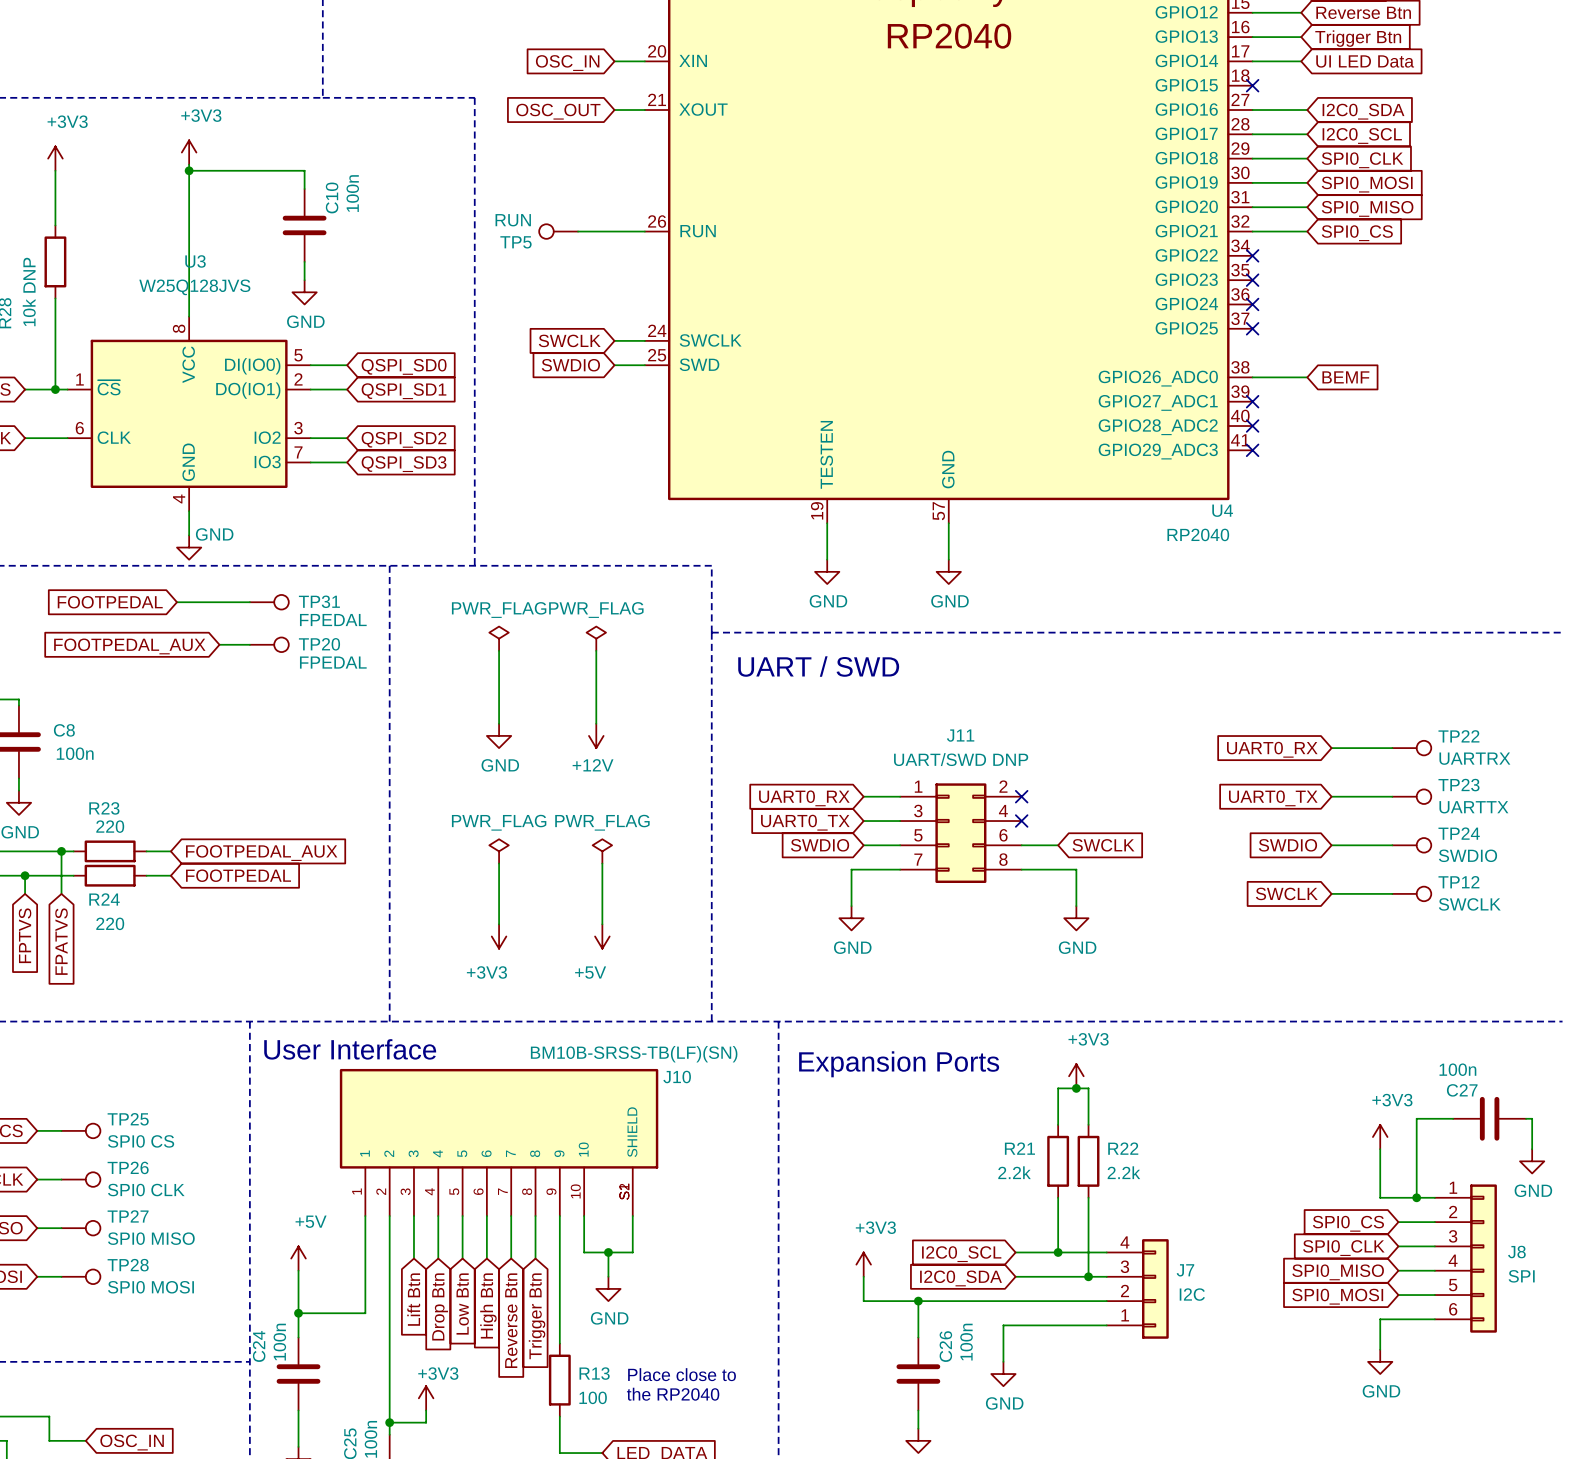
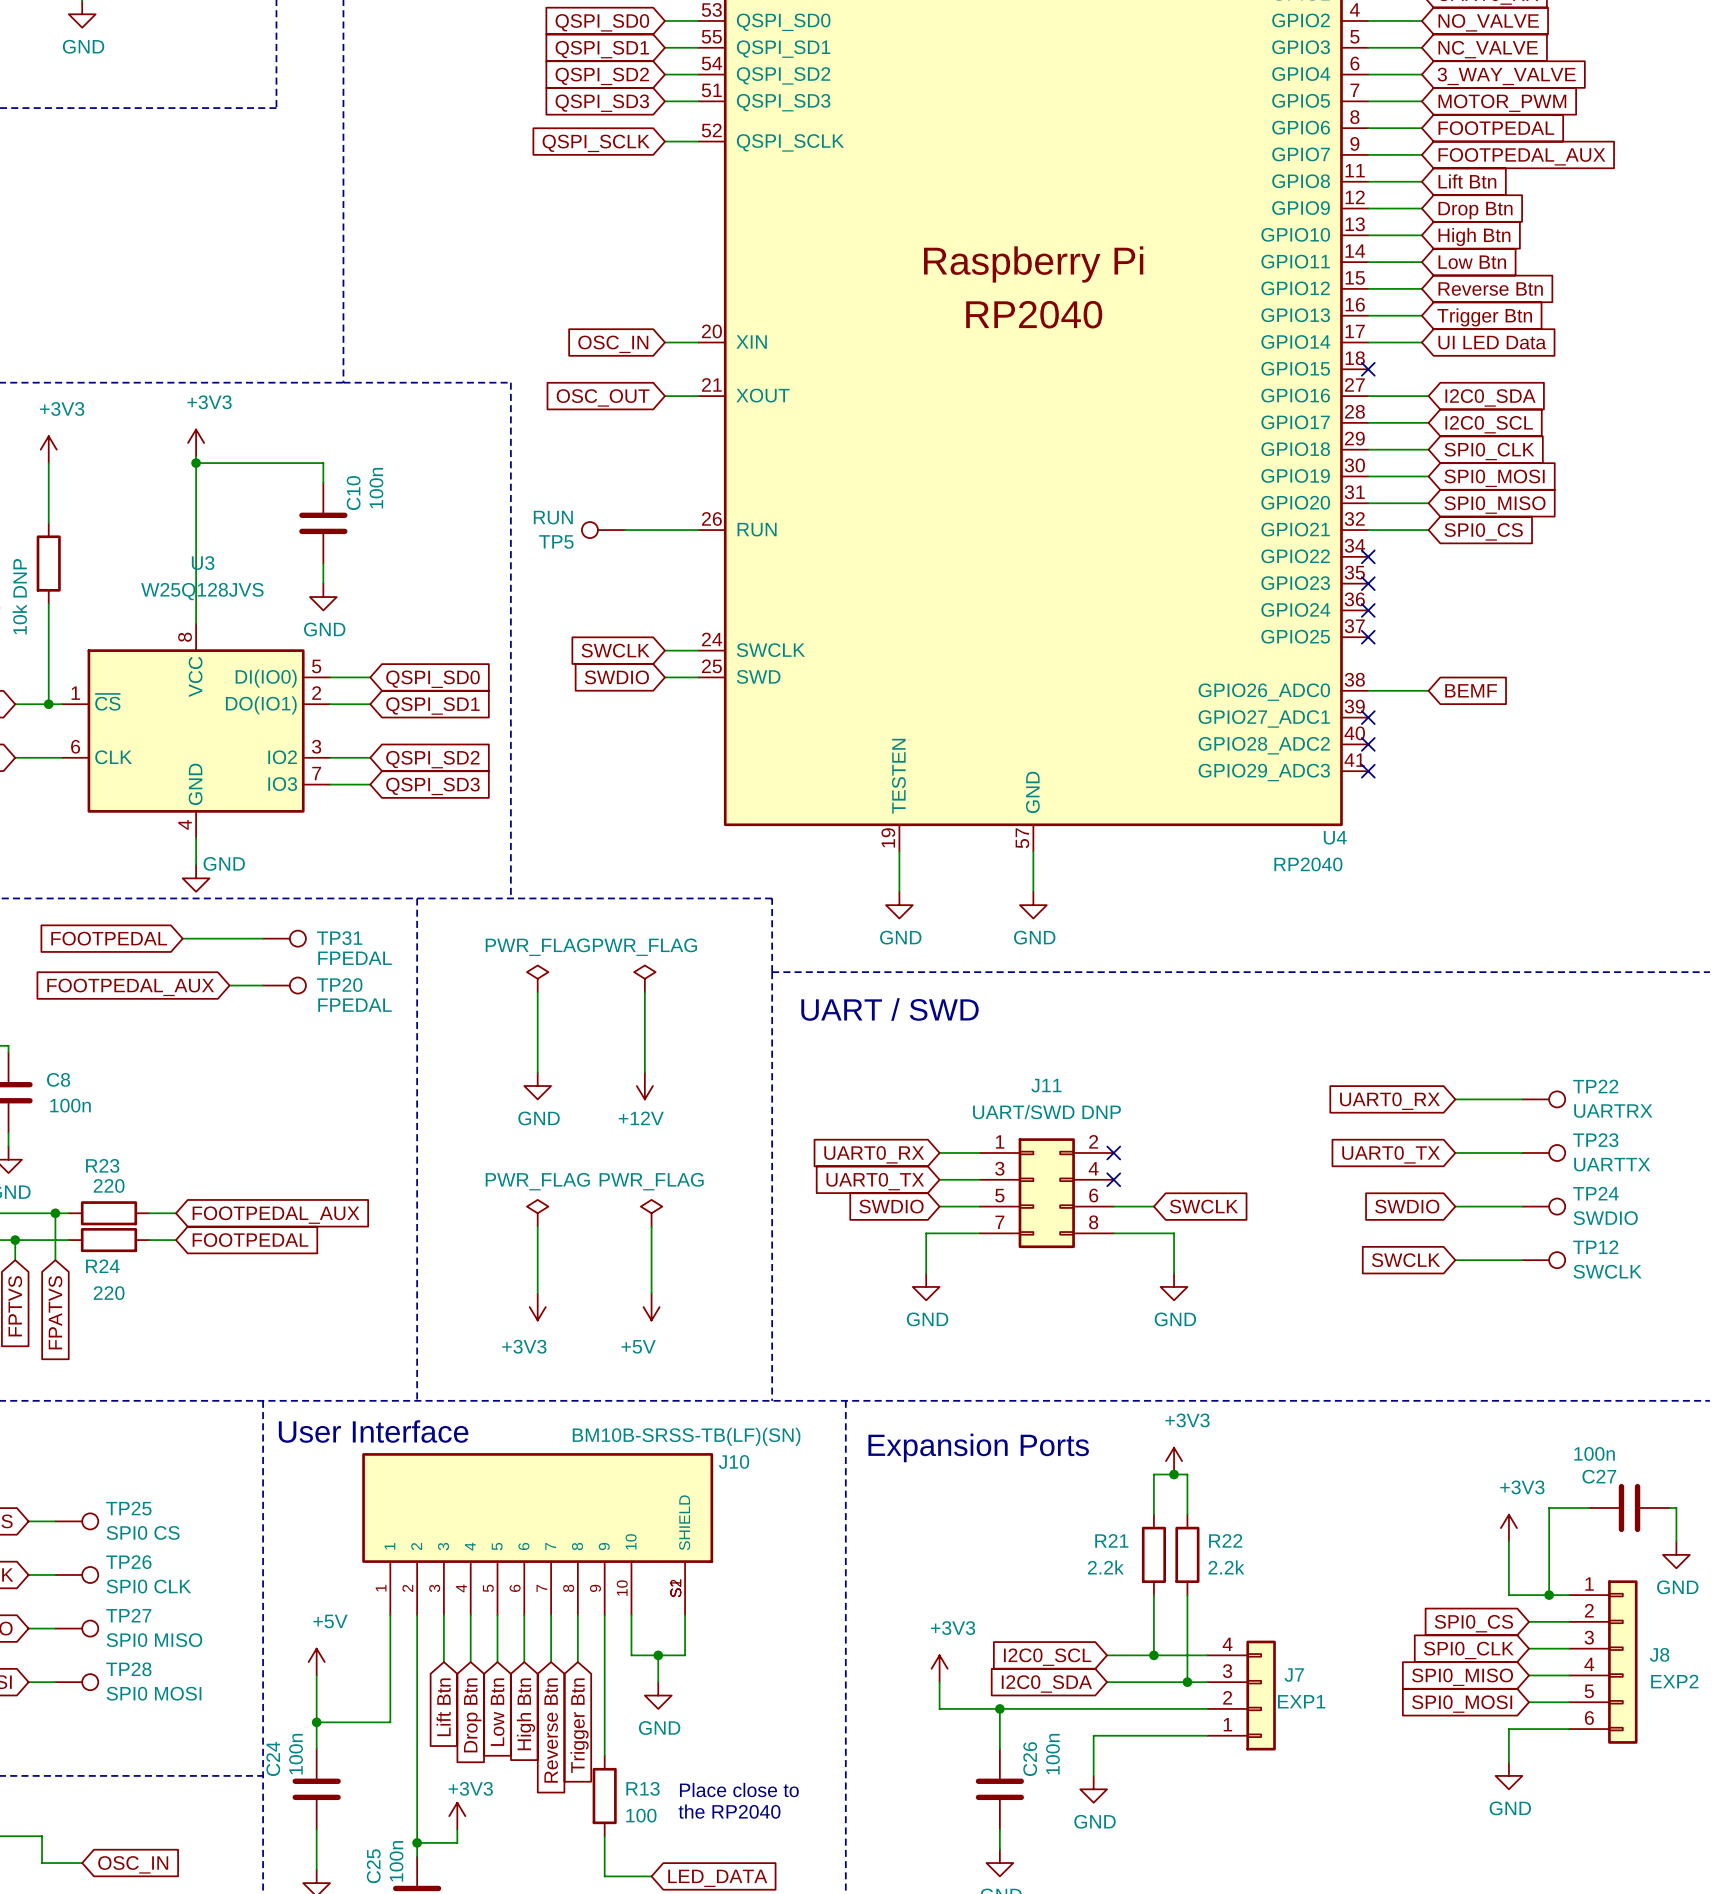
J8 value: SPI (1521, 1276) -> EXP2 (1674, 1681)
J7 value: I2C (1192, 1294) -> EXP1 (1301, 1701)

